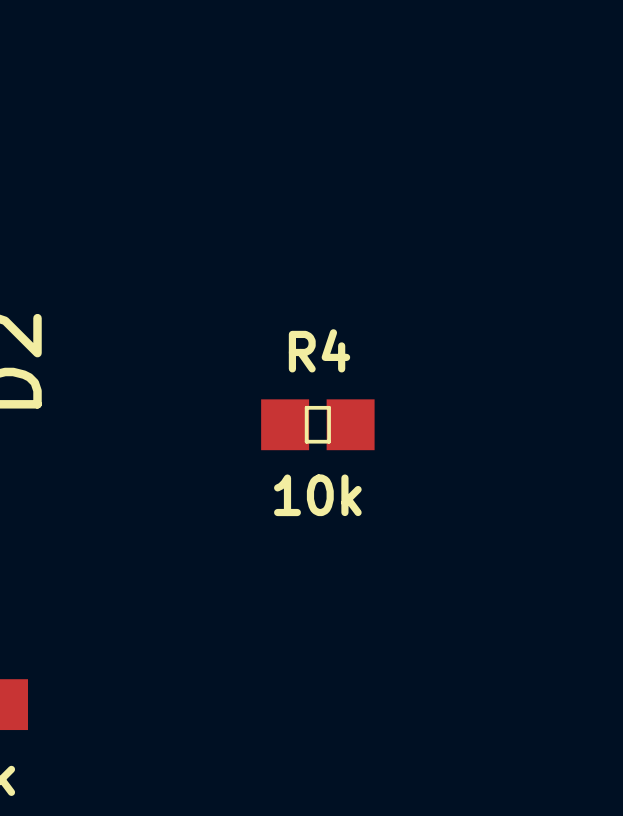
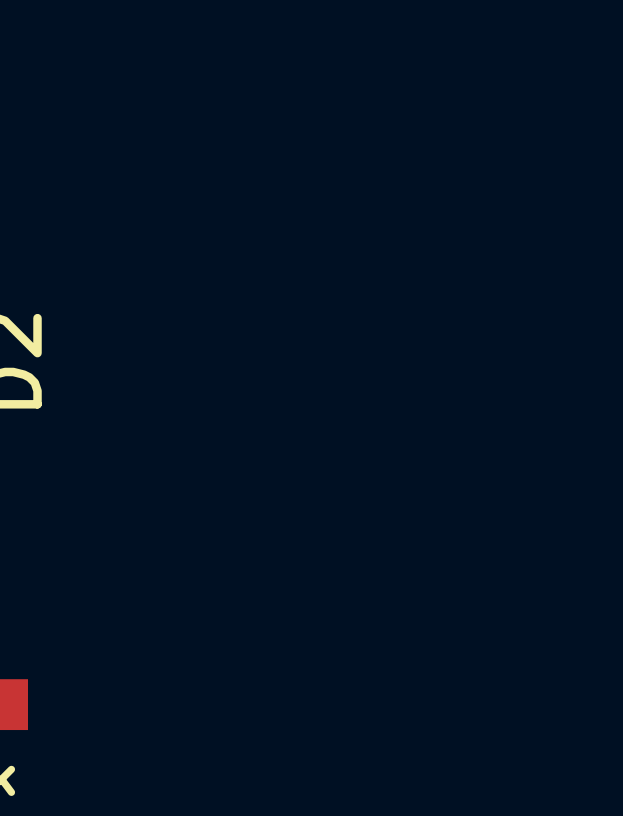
R4: 10k (317, 424) -> none

